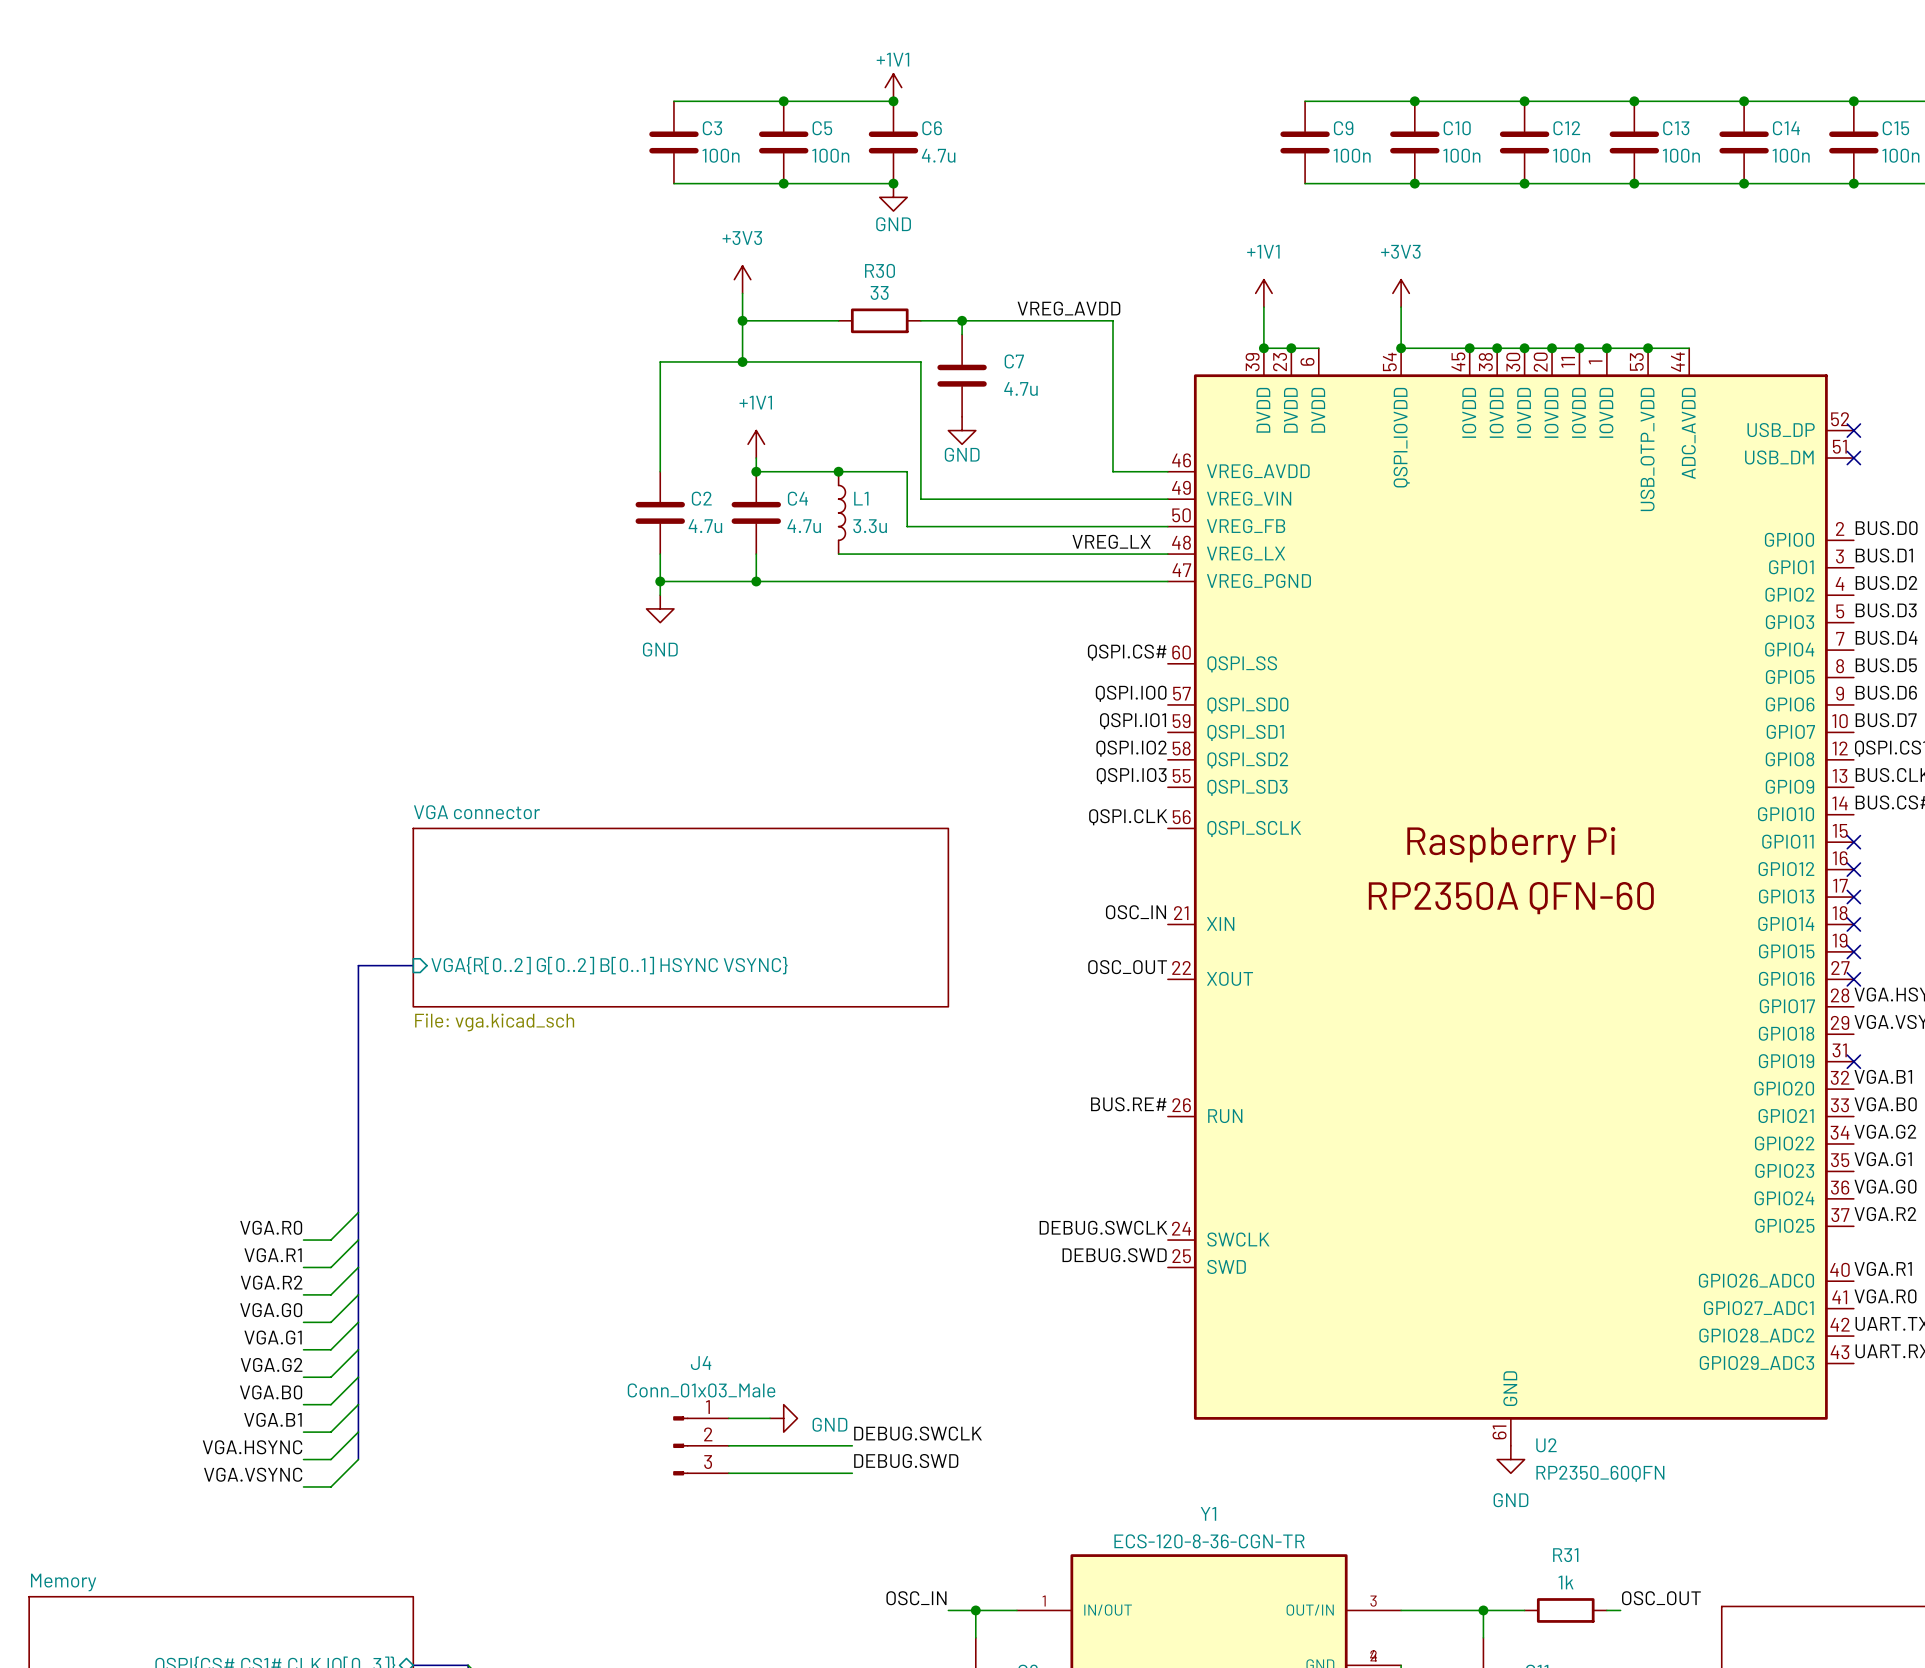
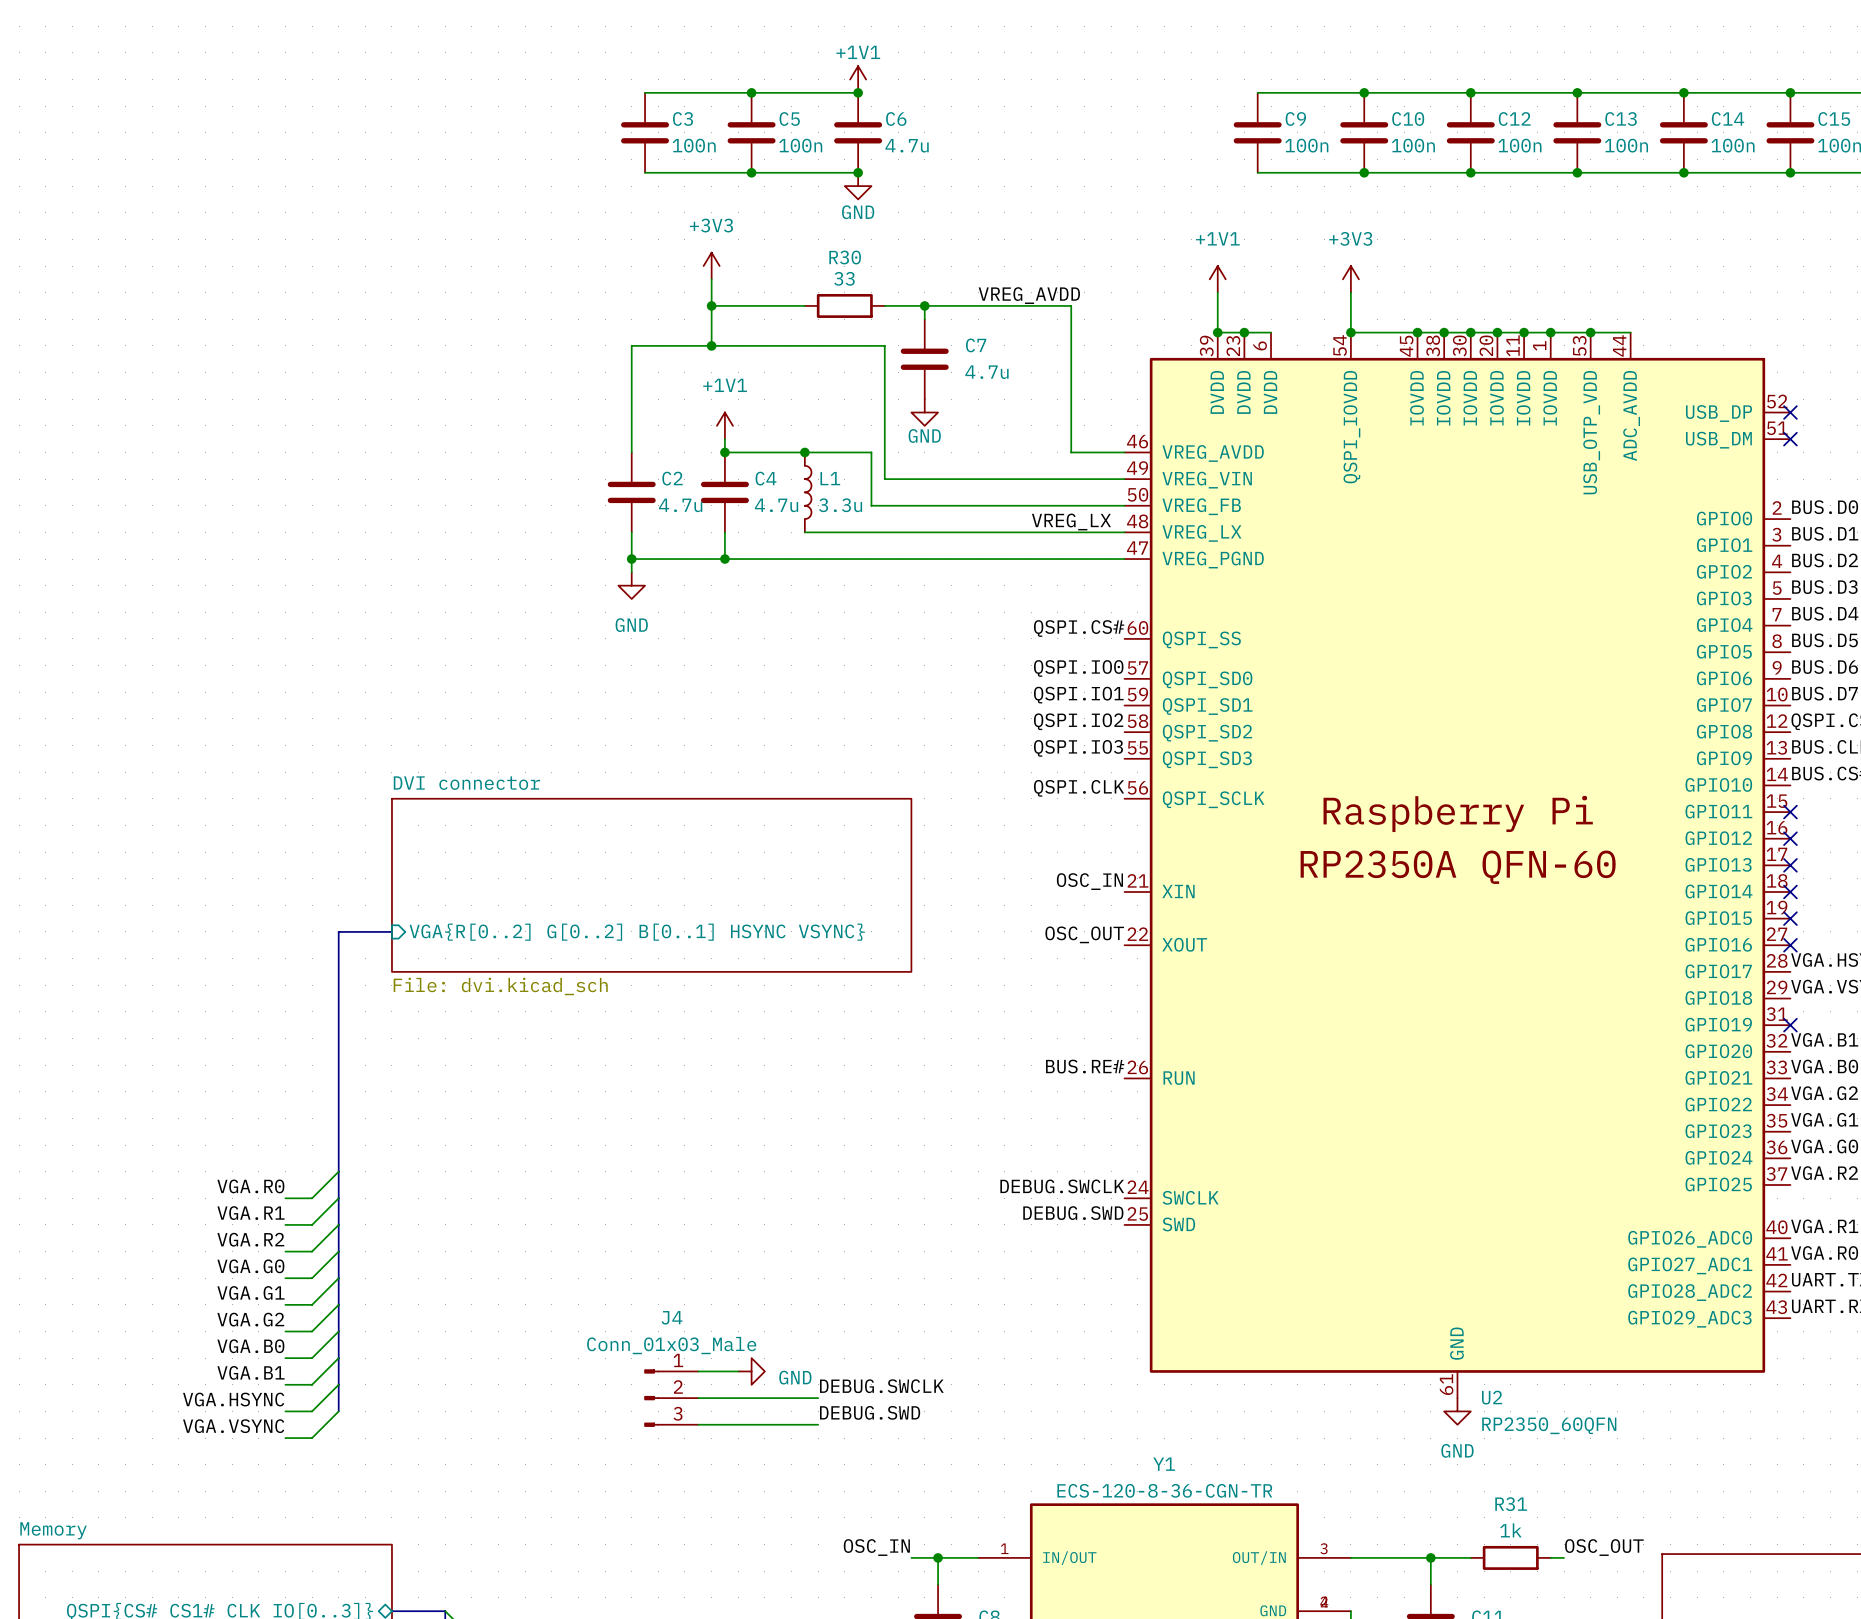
sheet VGA connector name: VGA connector (476, 812) -> DVI connector (466, 783)
sheet VGA connector value: File: vga.kicad_sch (494, 1022) -> File: dvi.kicad_sch (500, 986)

